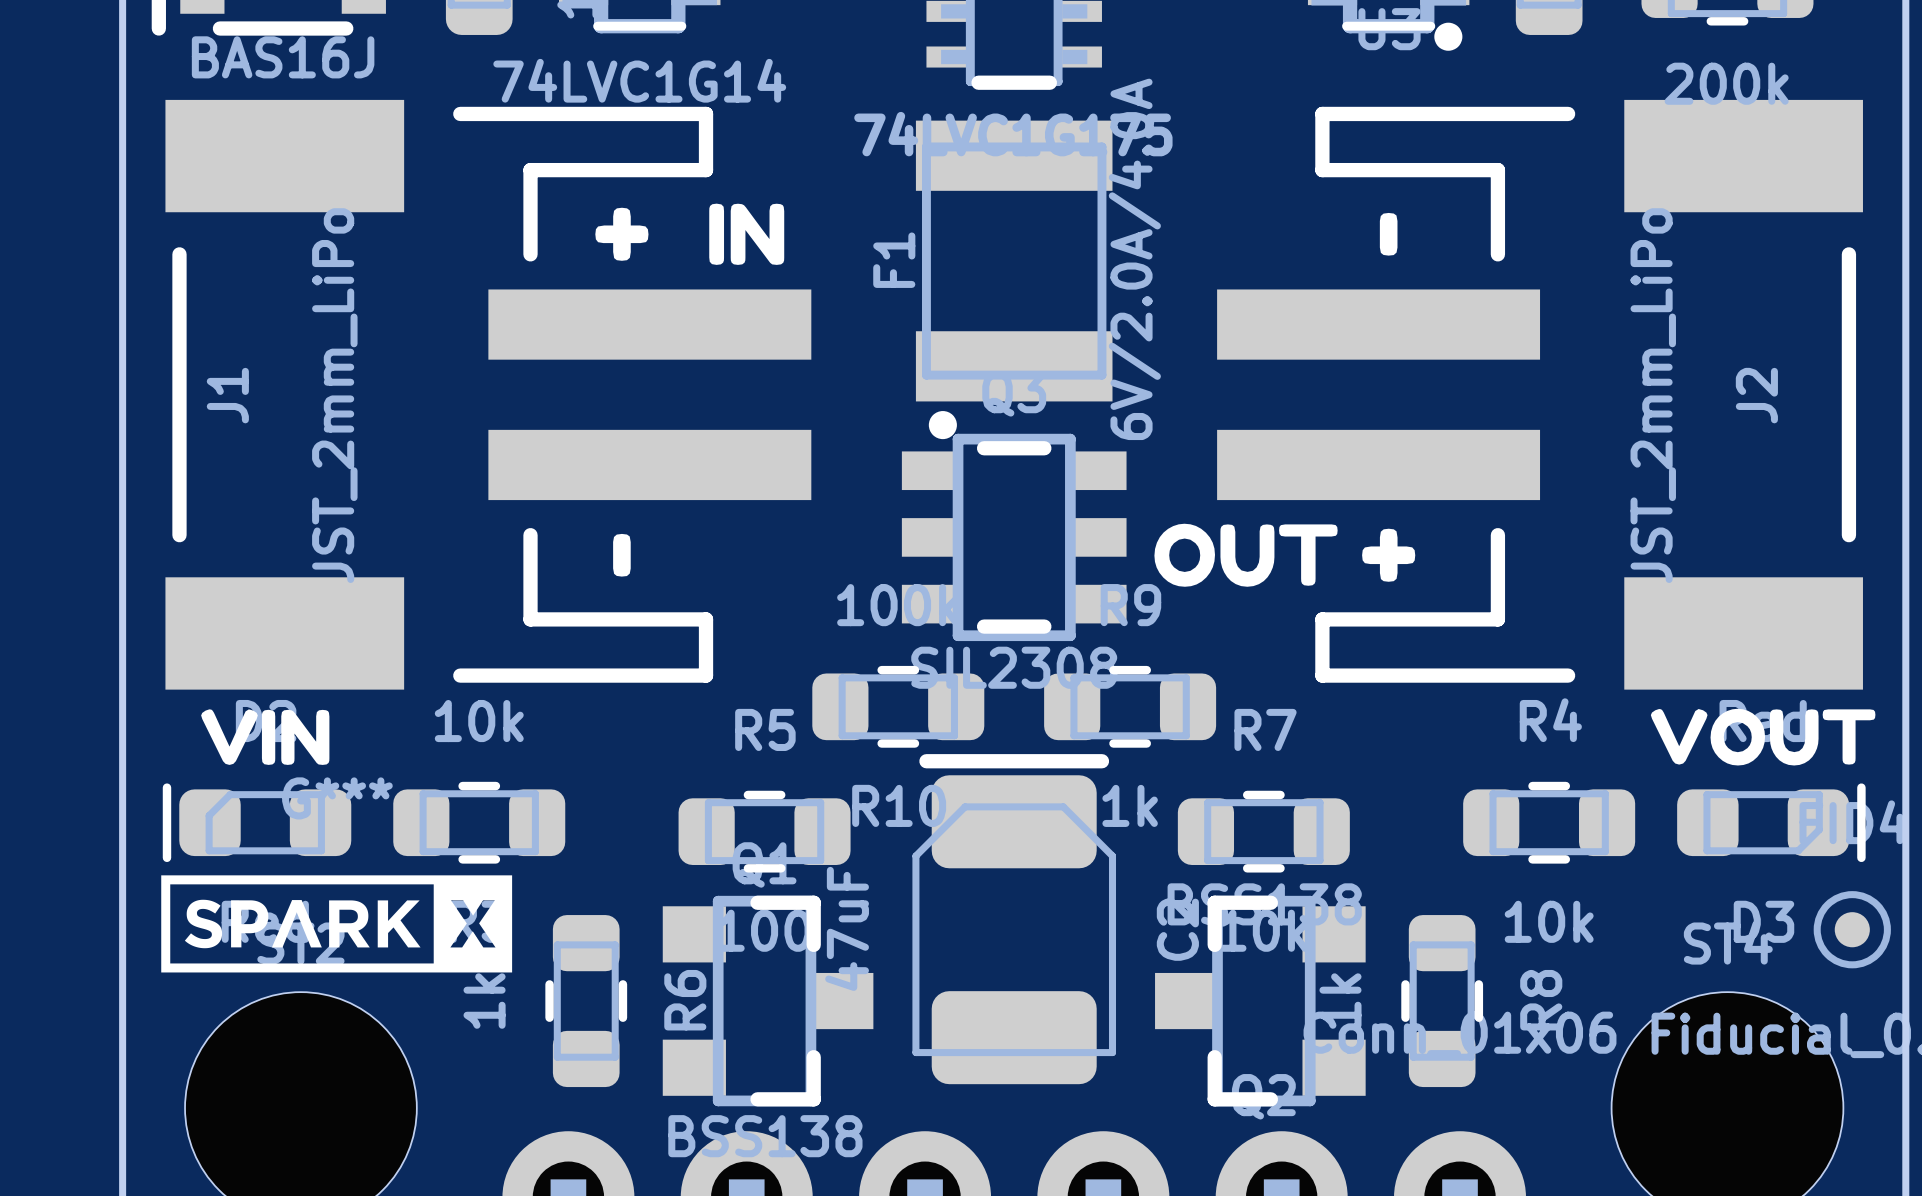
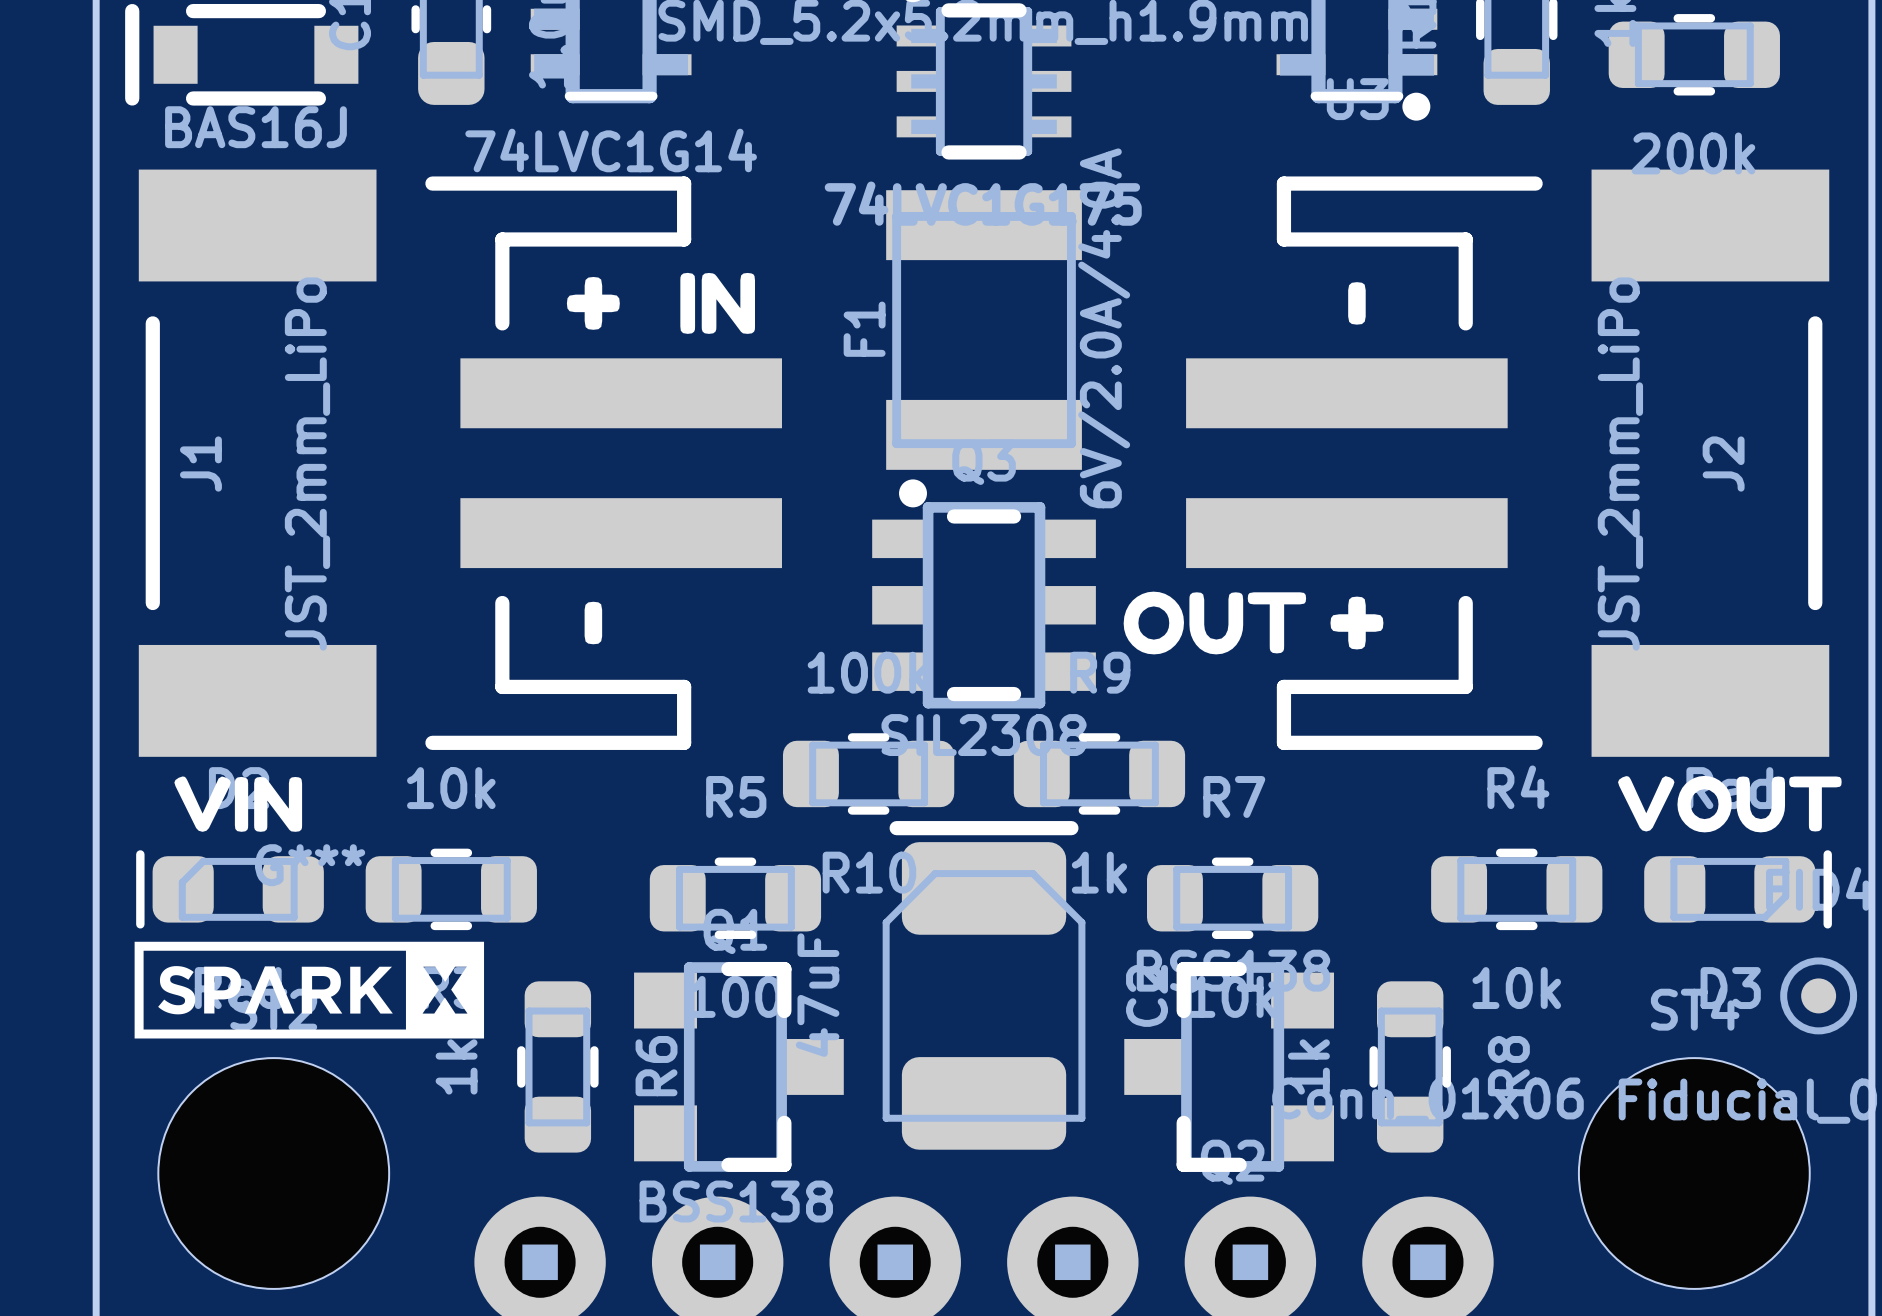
J1 footprint: [165, 99, 812, 690] -> [138, 169, 782, 757]
J2 footprint: [1217, 99, 1863, 690] -> [1186, 169, 1830, 757]

